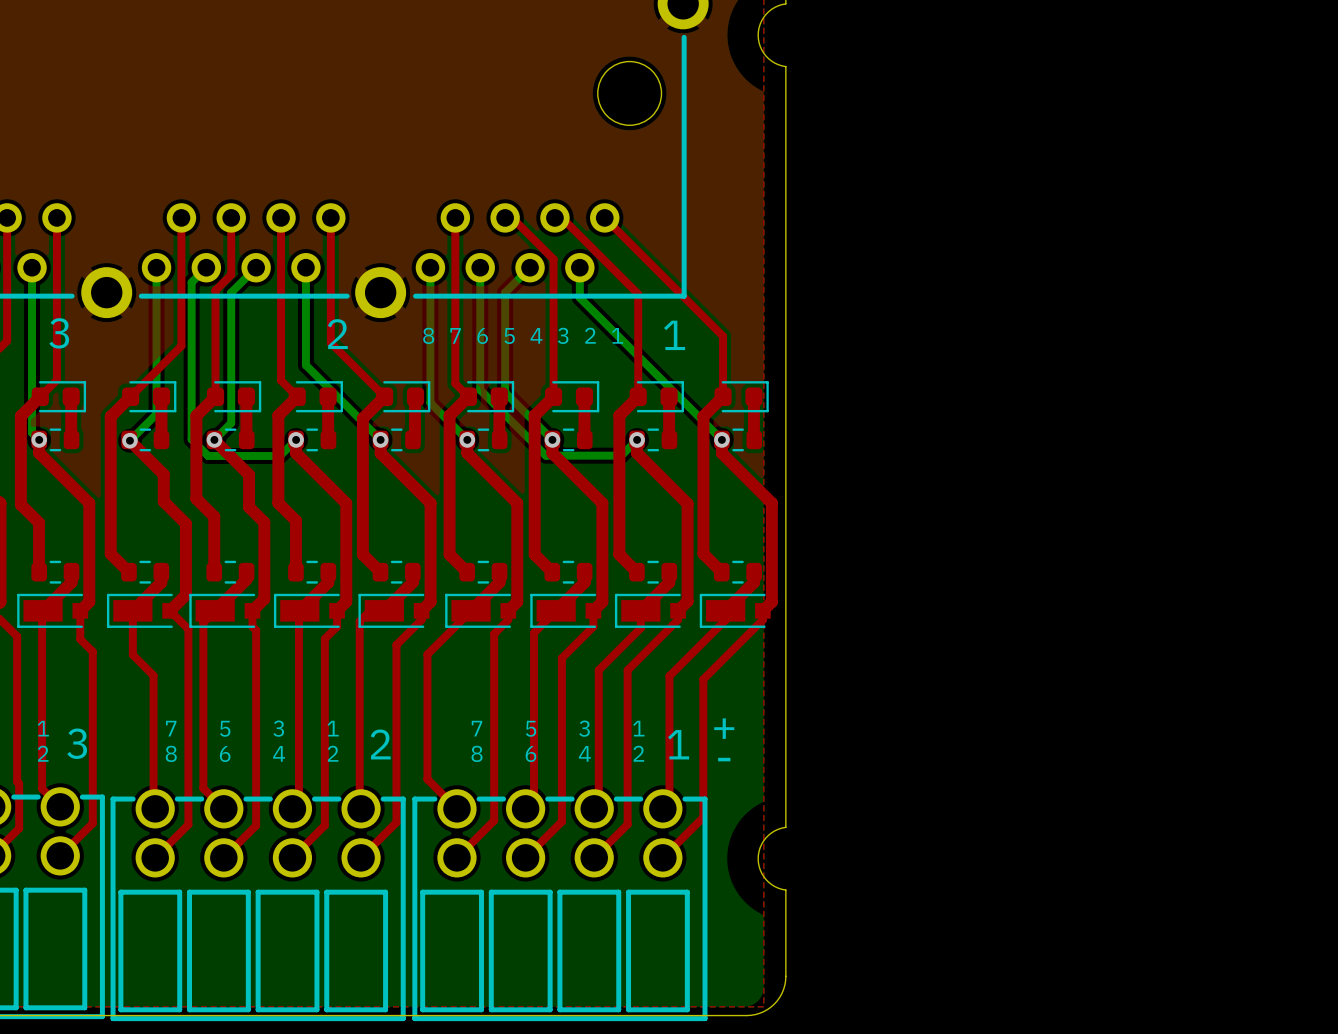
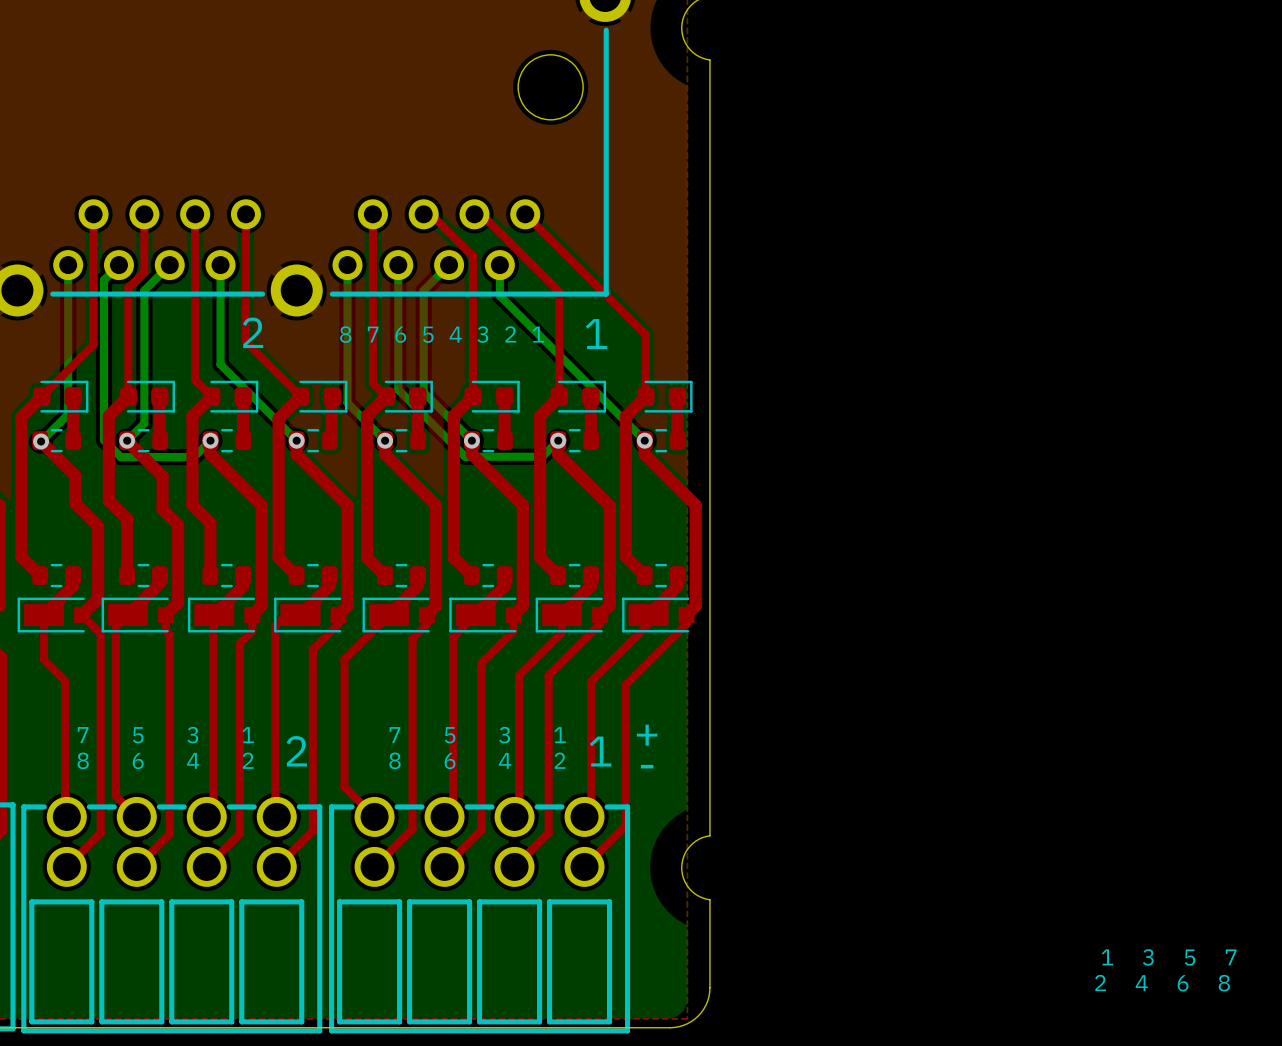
text: none -> 1 3 5 7 (1169, 957)
text: none -> 2 4 6 8 (1162, 983)

